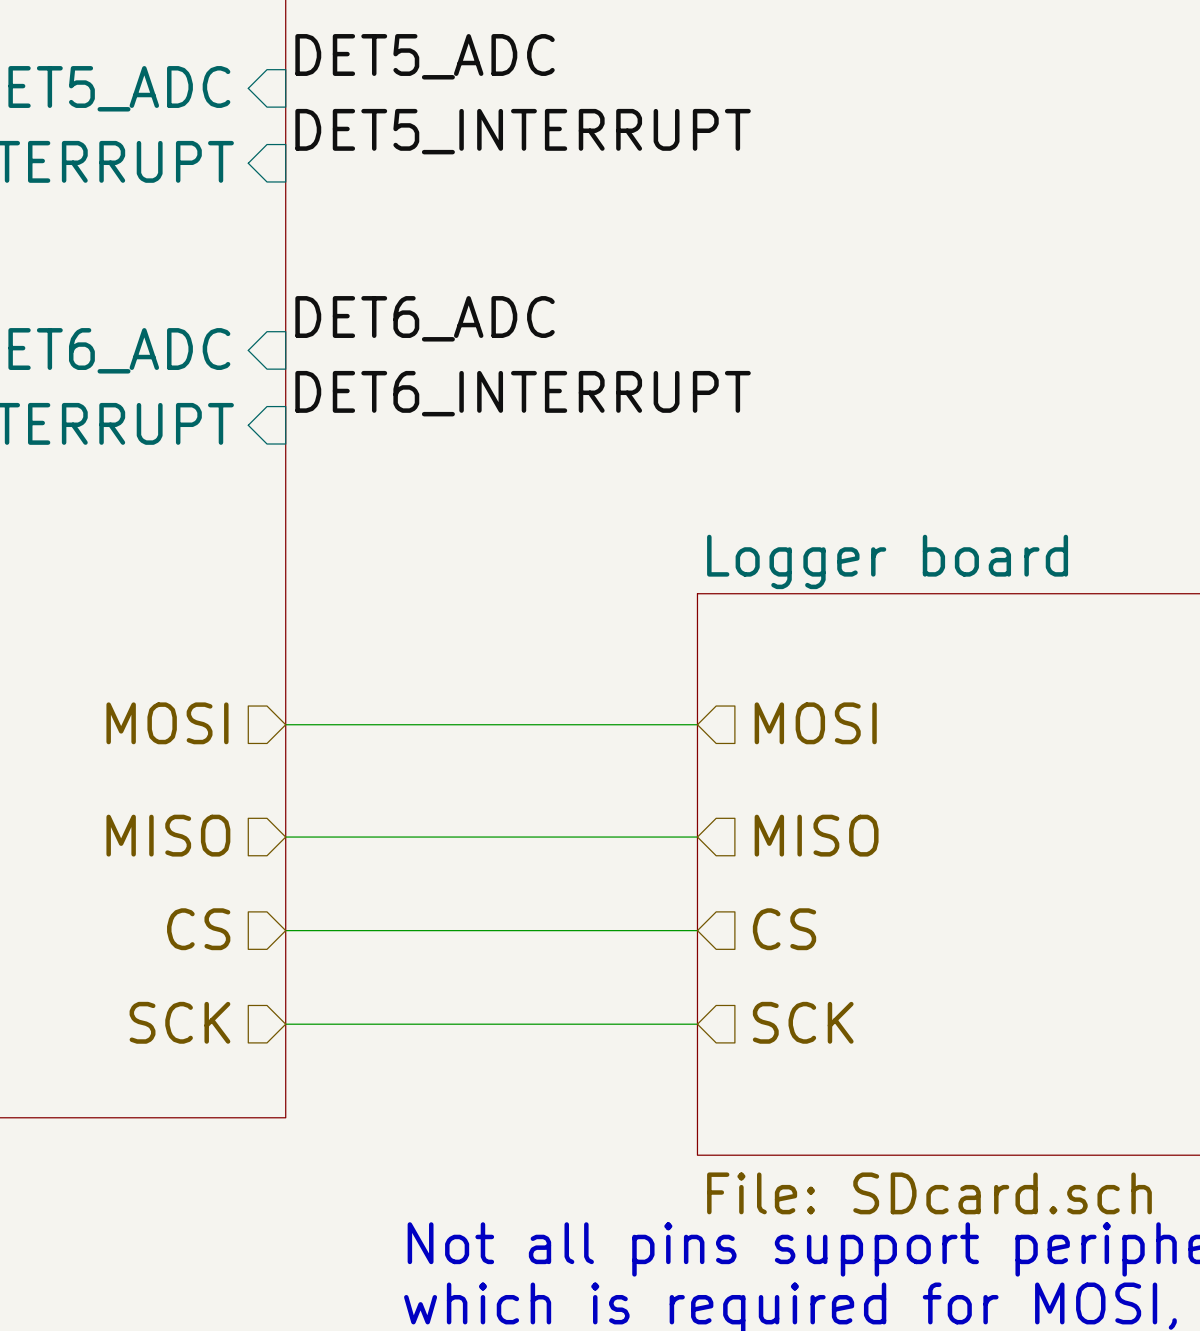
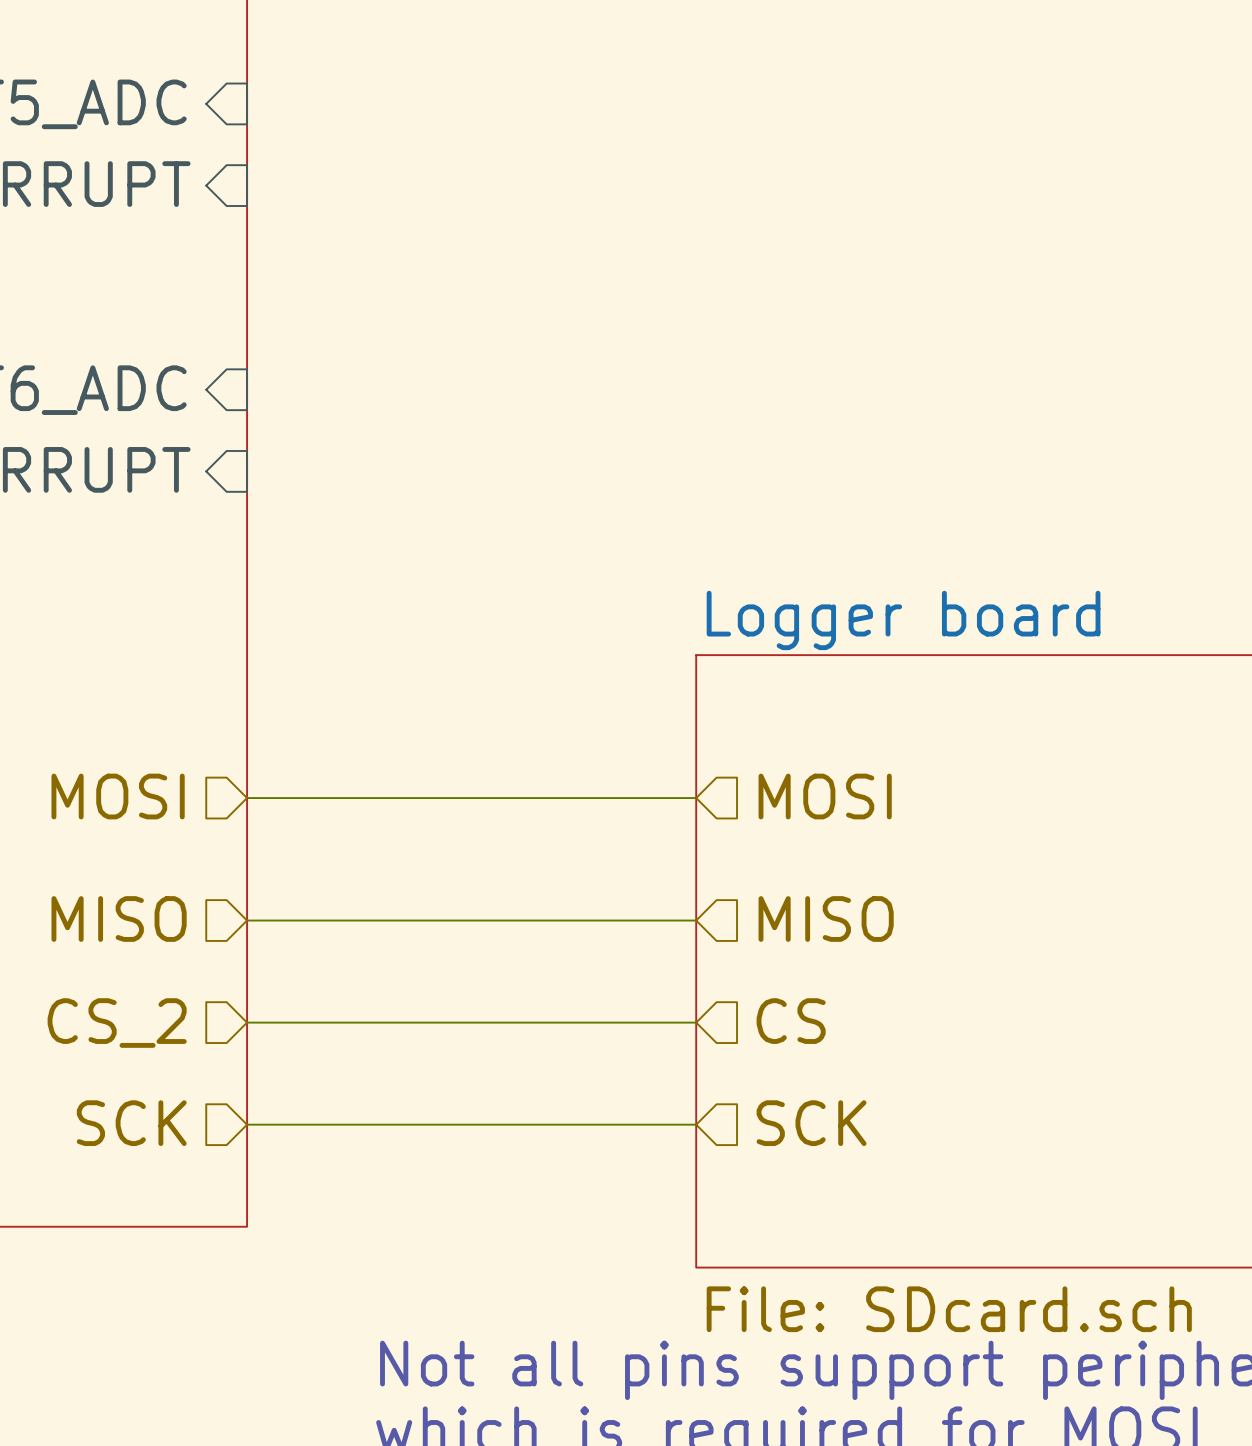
label: DET5_ADC (425, 56) -> none
label: DET5_INTERRUPT (523, 131) -> none
label: DET6_ADC (425, 318) -> none
label: DET6_INTERRUPT (523, 393) -> none
hierarchical label: CS (198, 929) -> CS_2 (117, 1023)

